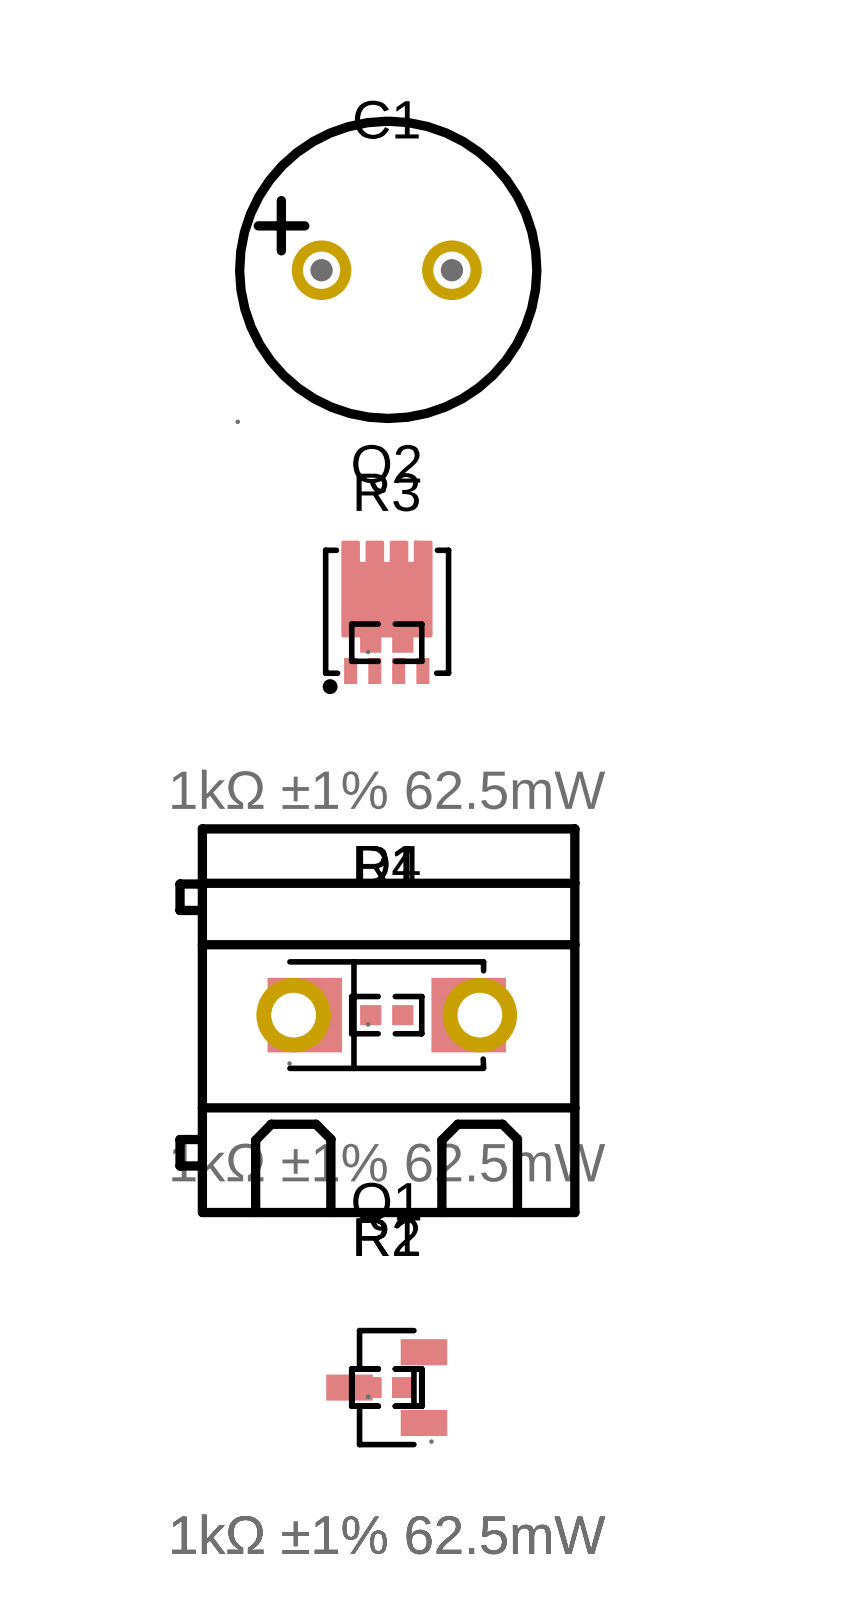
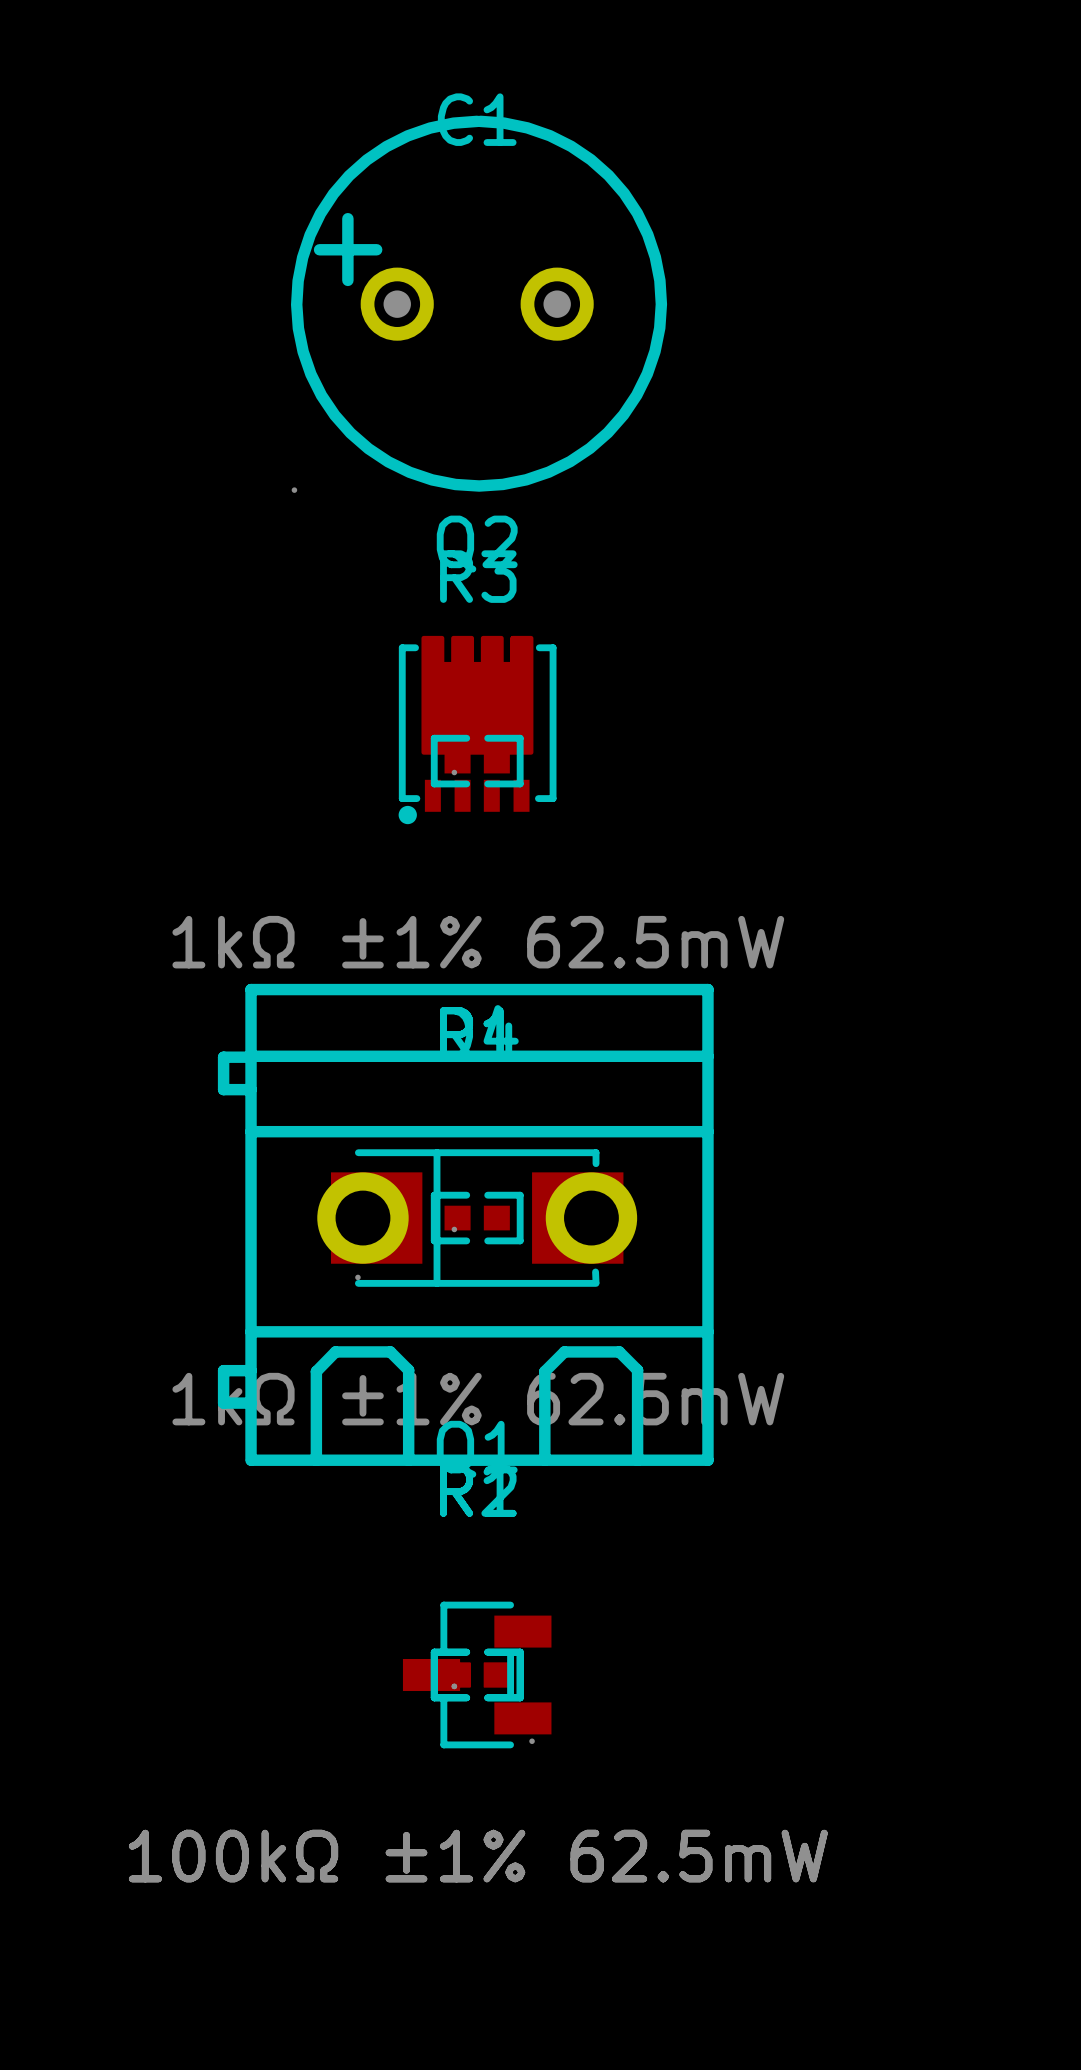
part value: 1kΩ ±1% 62.5mW (388, 1534) -> 100kΩ ±1% 62.5mW (478, 1856)
part value: 1kΩ ±1% 62.5mW (388, 1534) -> 100kΩ ±1% 62.5mW (478, 1856)

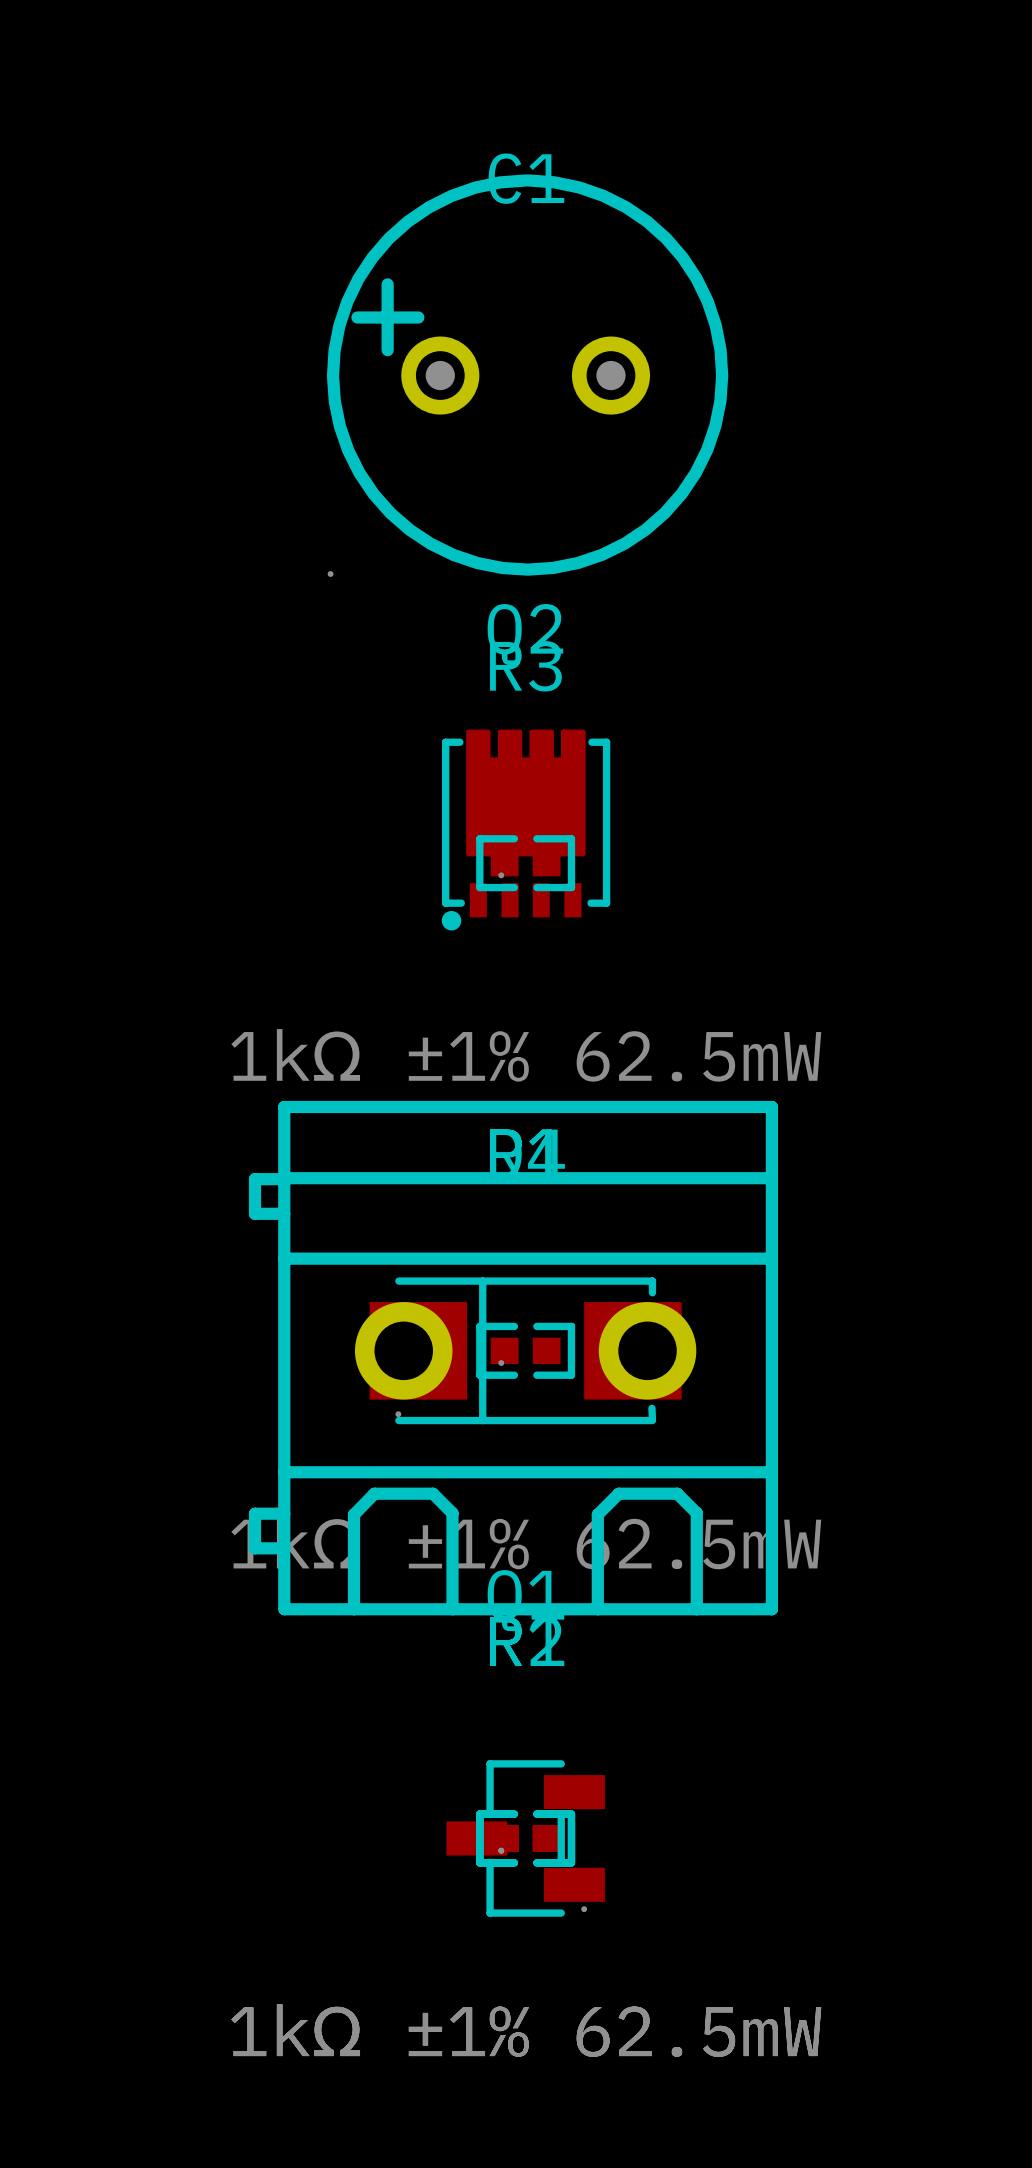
part value: 100kΩ ±1% 62.5mW (478, 1856) -> 1kΩ ±1% 62.5mW (526, 2030)
part value: 100kΩ ±1% 62.5mW (478, 1856) -> 1kΩ ±1% 62.5mW (526, 2030)

